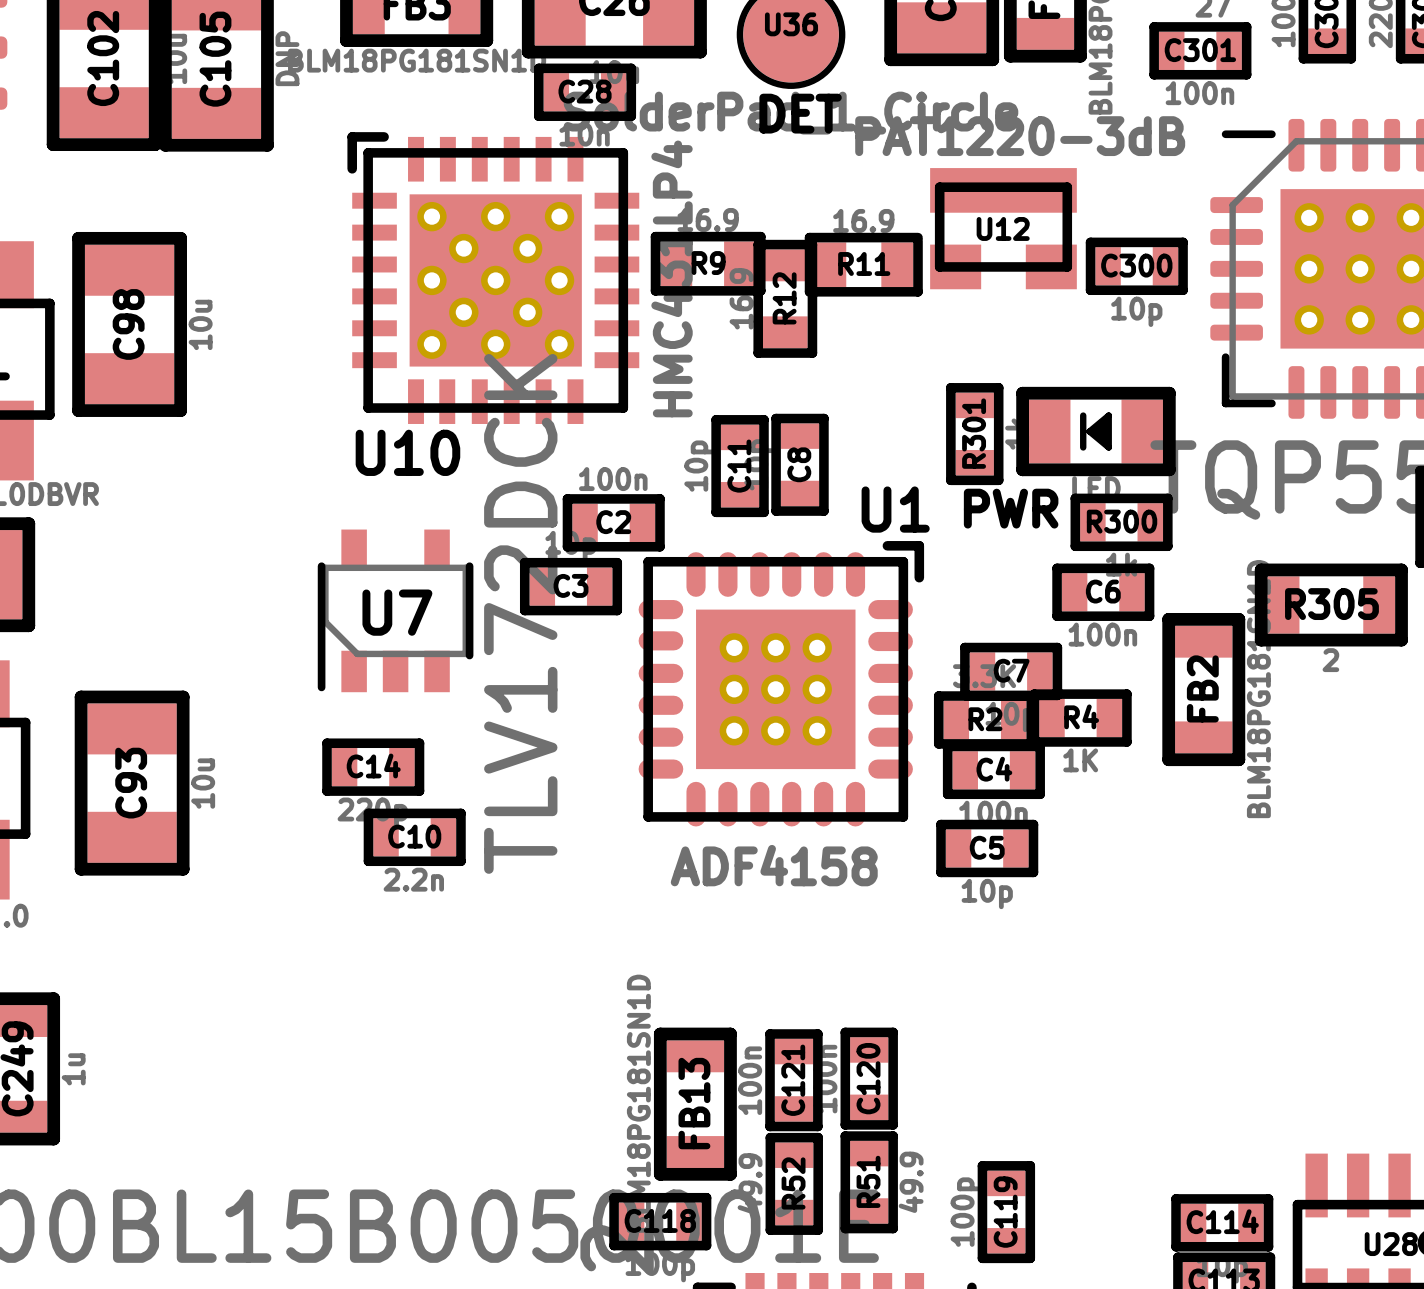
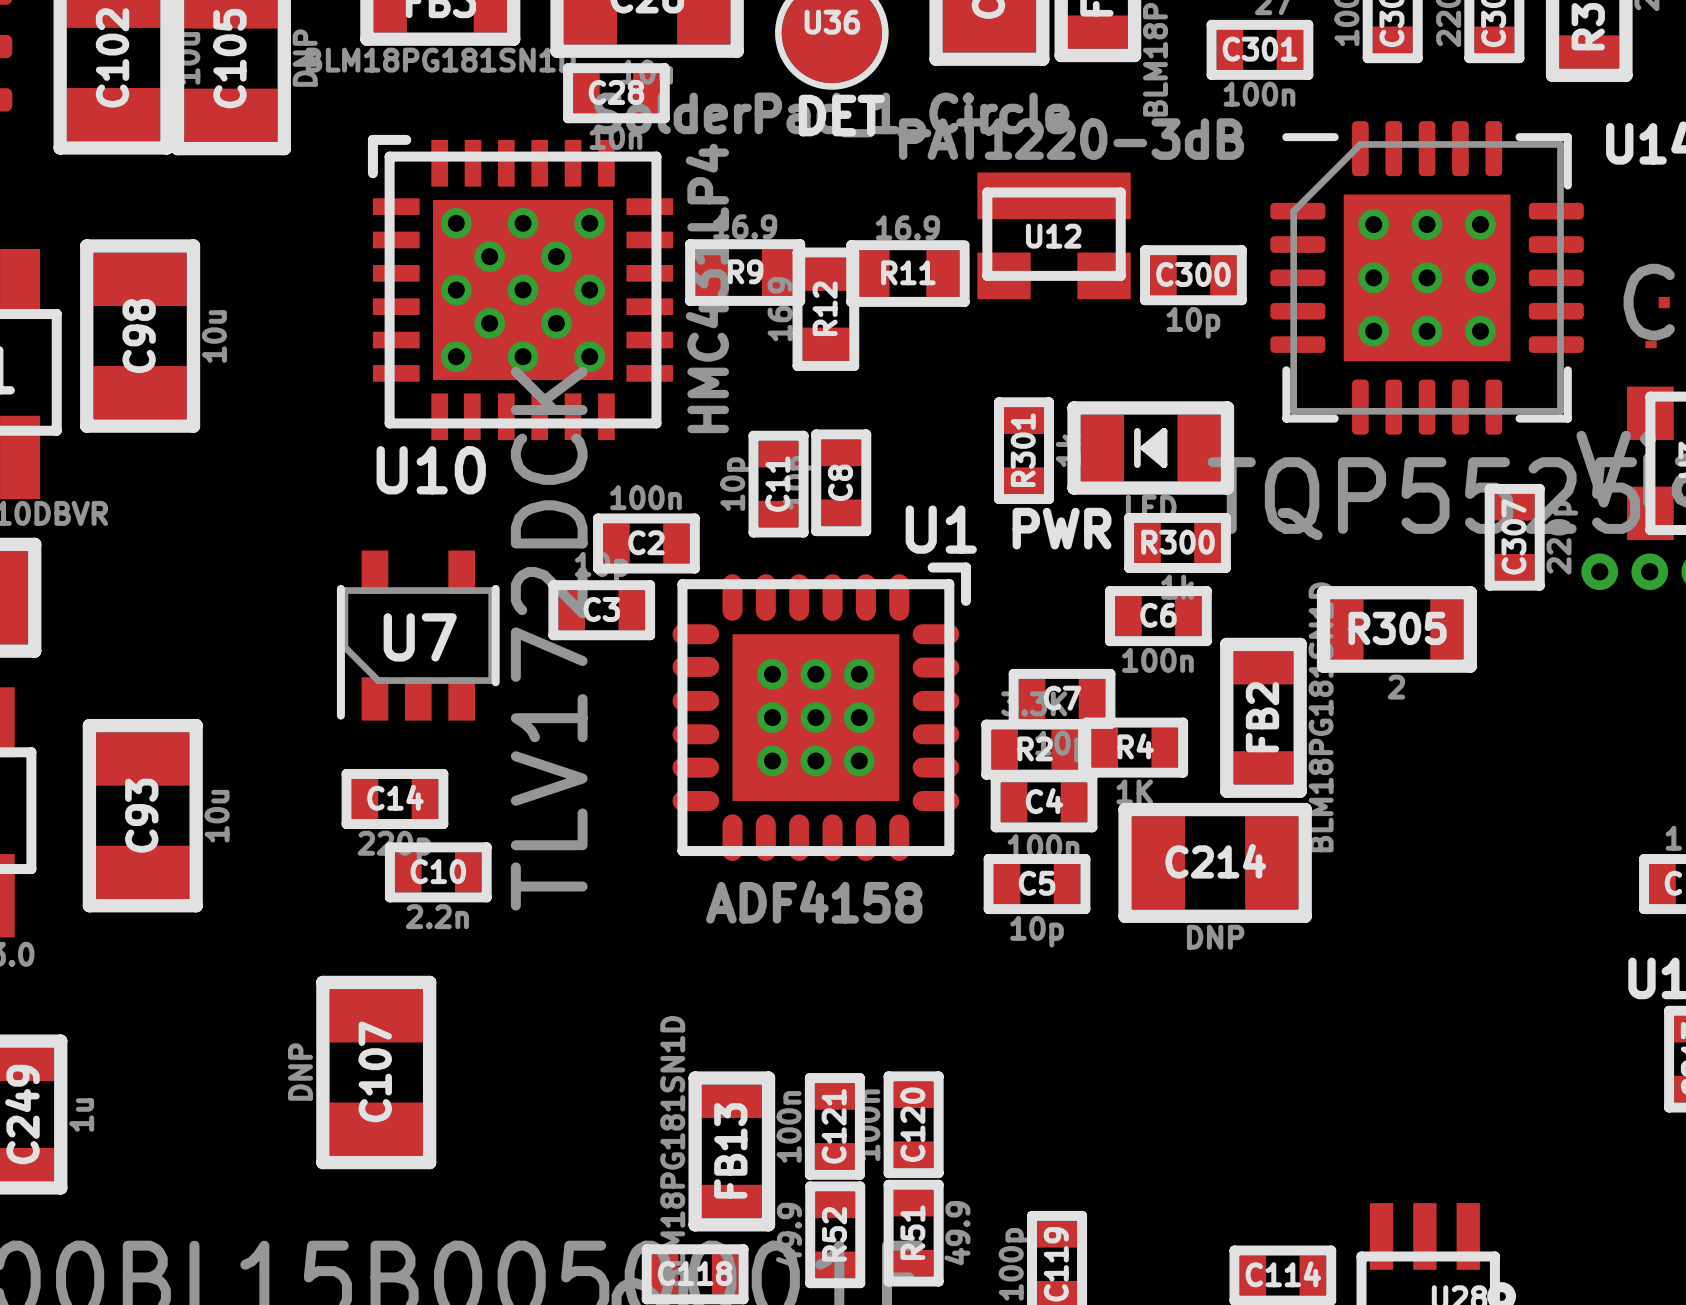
C214: none -> DNP (1215, 862)
C107: none -> DNP (376, 1072)

